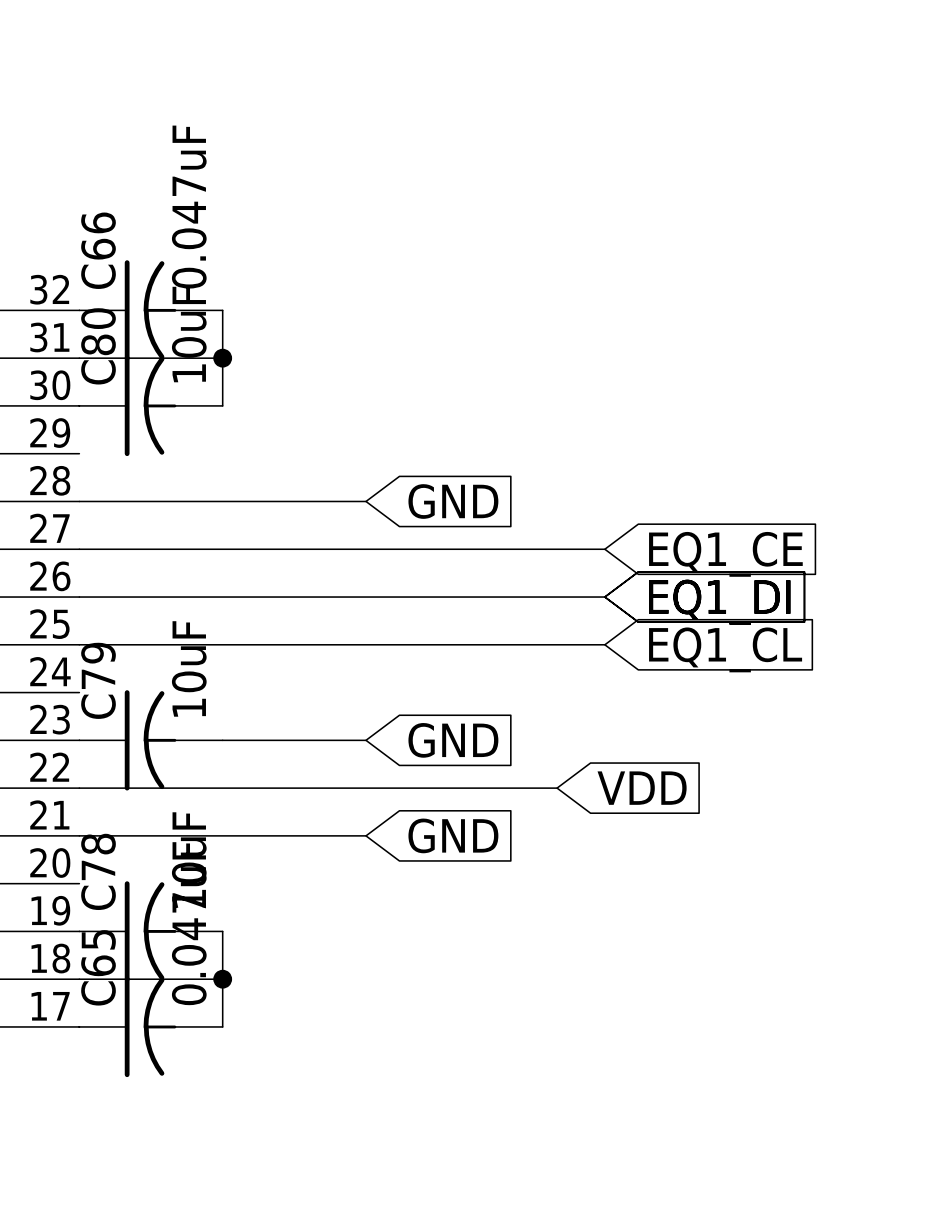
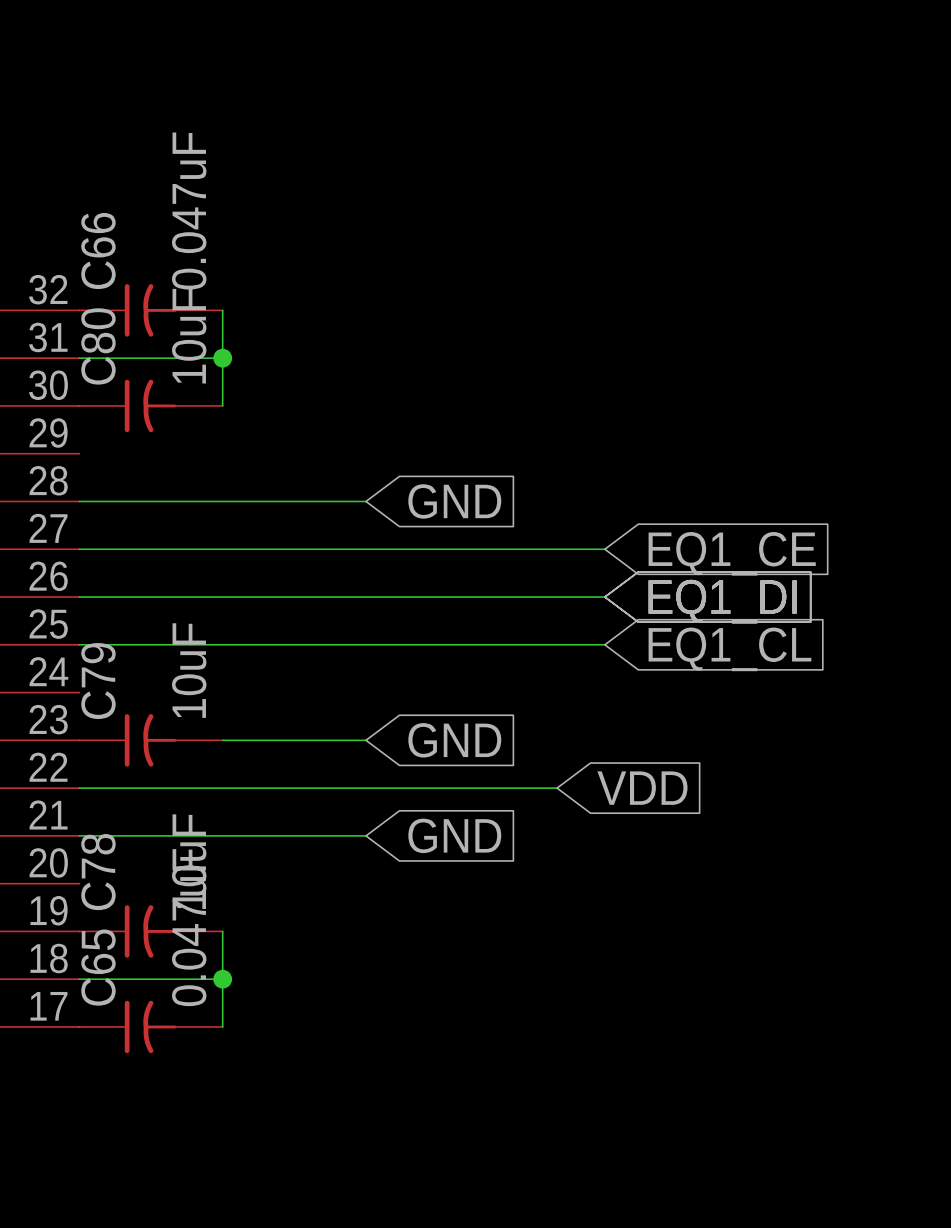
C66 symbol: [79, 260, 223, 361] -> [79, 284, 223, 337]
C80 symbol: [79, 355, 223, 457] -> [79, 379, 223, 433]
C79 symbol: [79, 690, 223, 791] -> [79, 714, 223, 767]
C78 symbol: [79, 881, 223, 982] -> [79, 905, 223, 958]
C65 symbol: [79, 976, 223, 1078] -> [79, 1000, 223, 1054]

